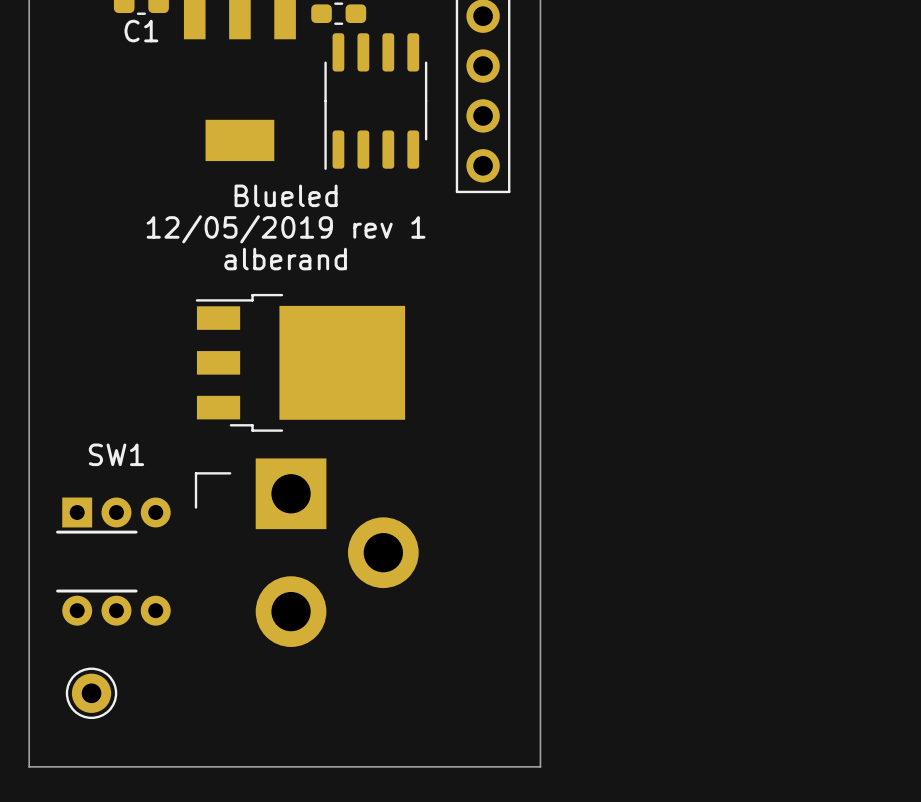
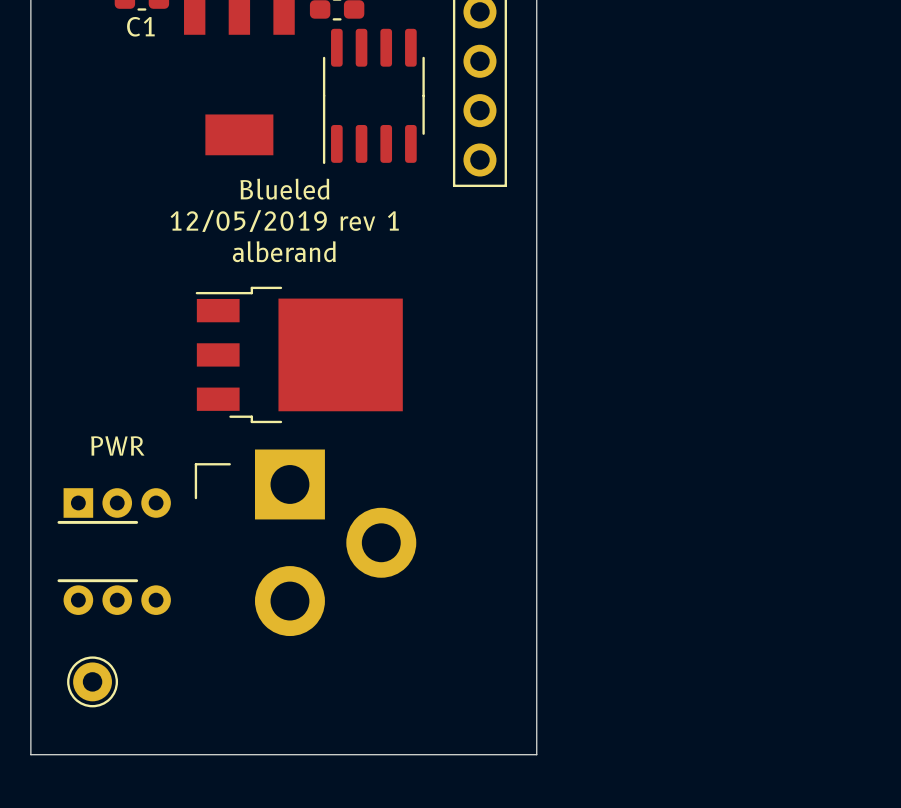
SW1 name: SW1 (116, 454) -> PWR (117, 445)

